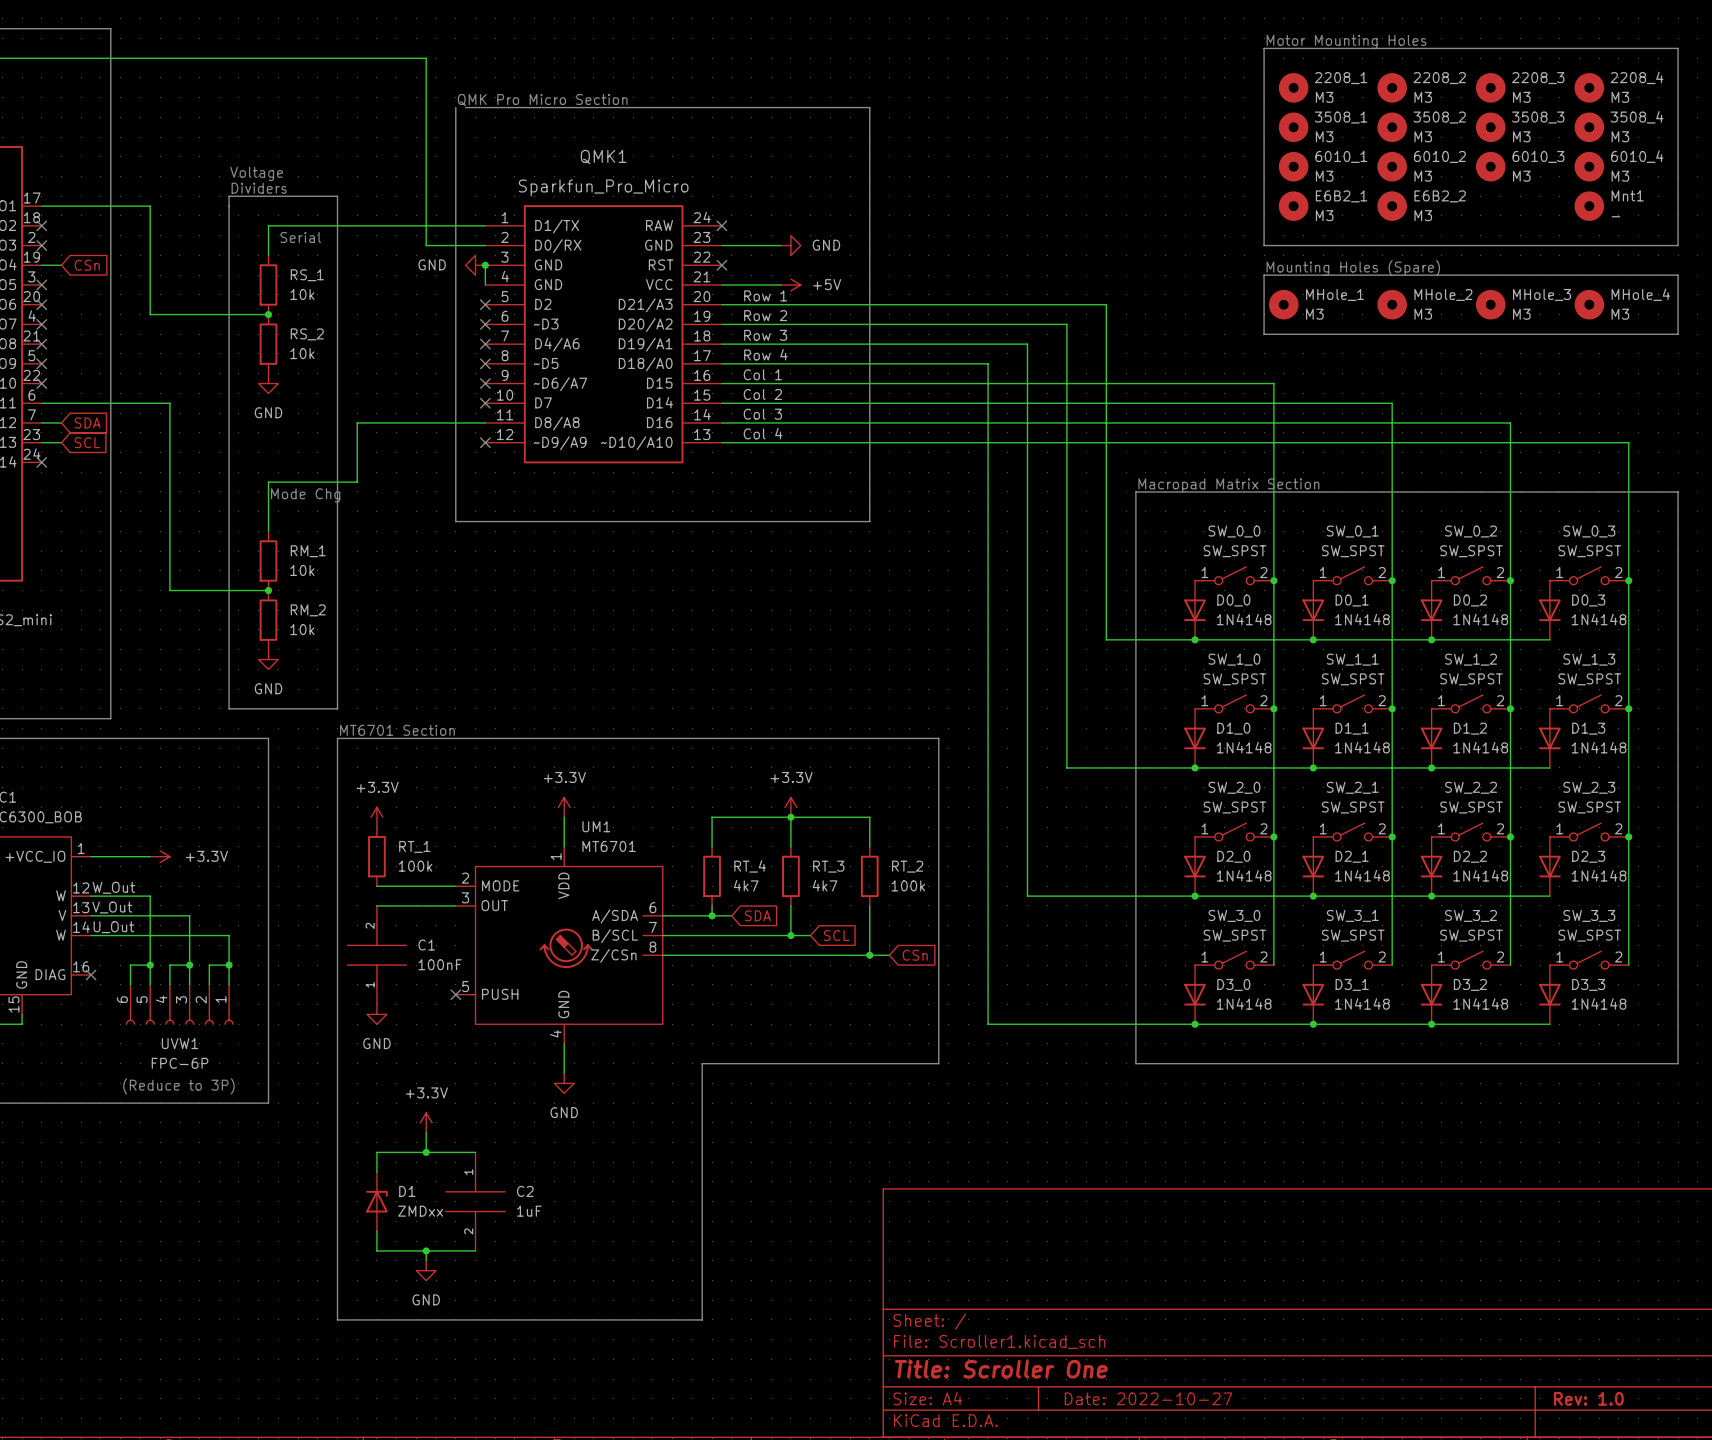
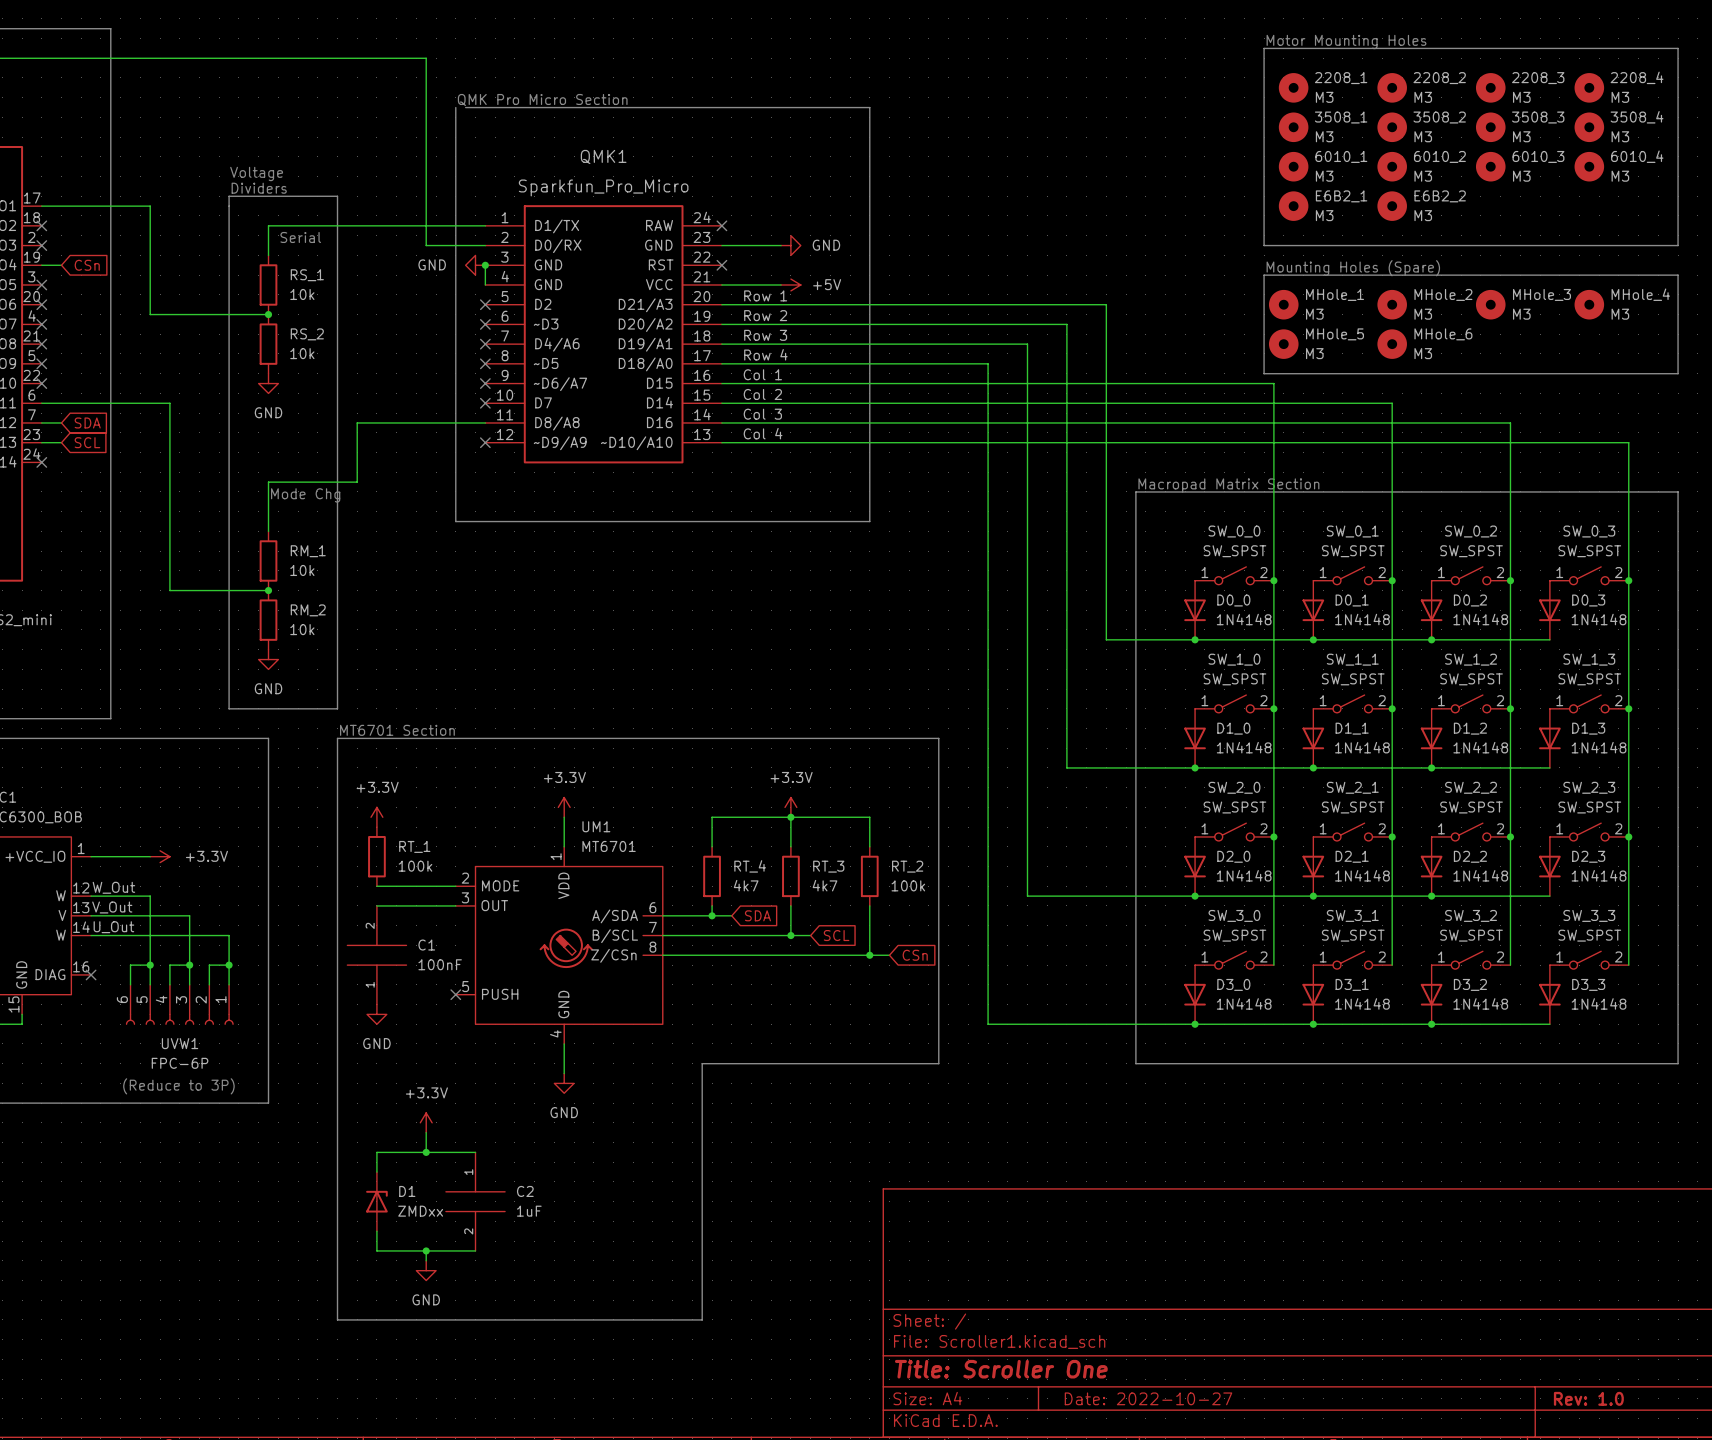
Mnt1: - (1589, 206) -> none
line: (1264, 334) (1678, 334) -> (1264, 334) (1264, 373) (1678, 373) (1678, 334)
MHole_5: none -> M3 (1283, 344)
MHole_6: none -> M3 (1392, 344)

